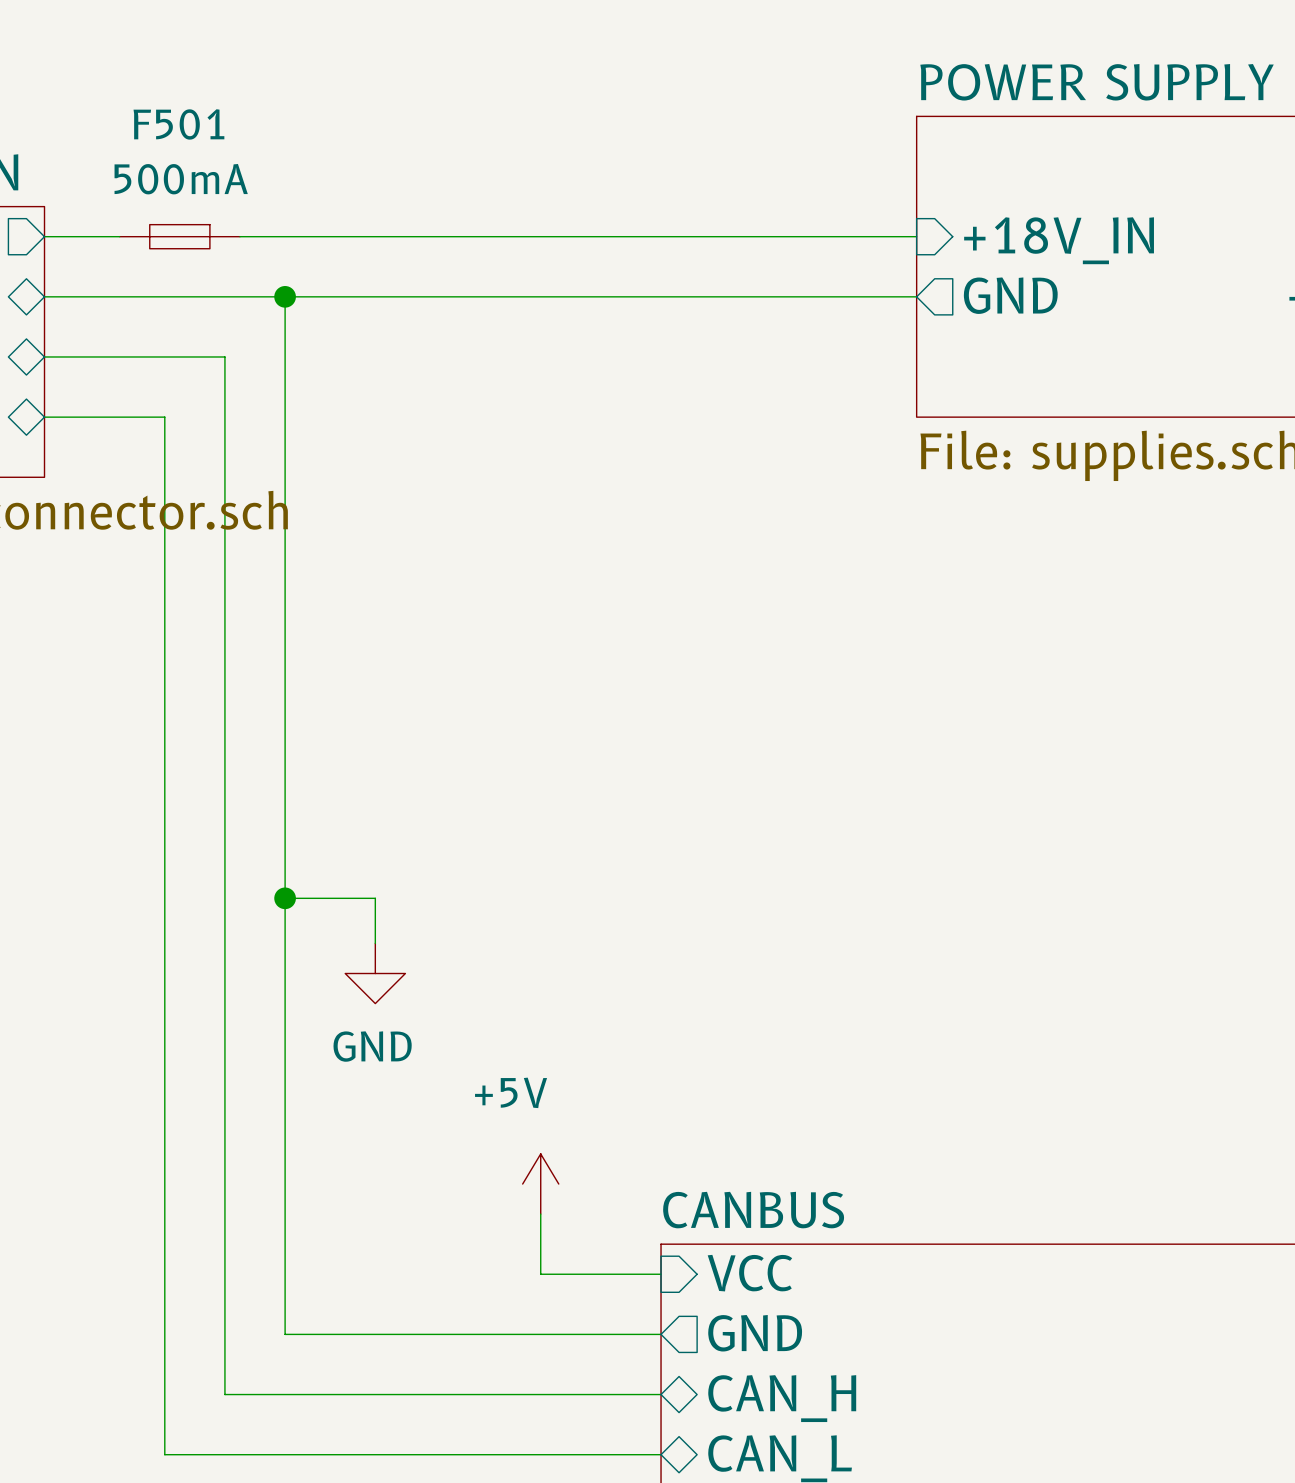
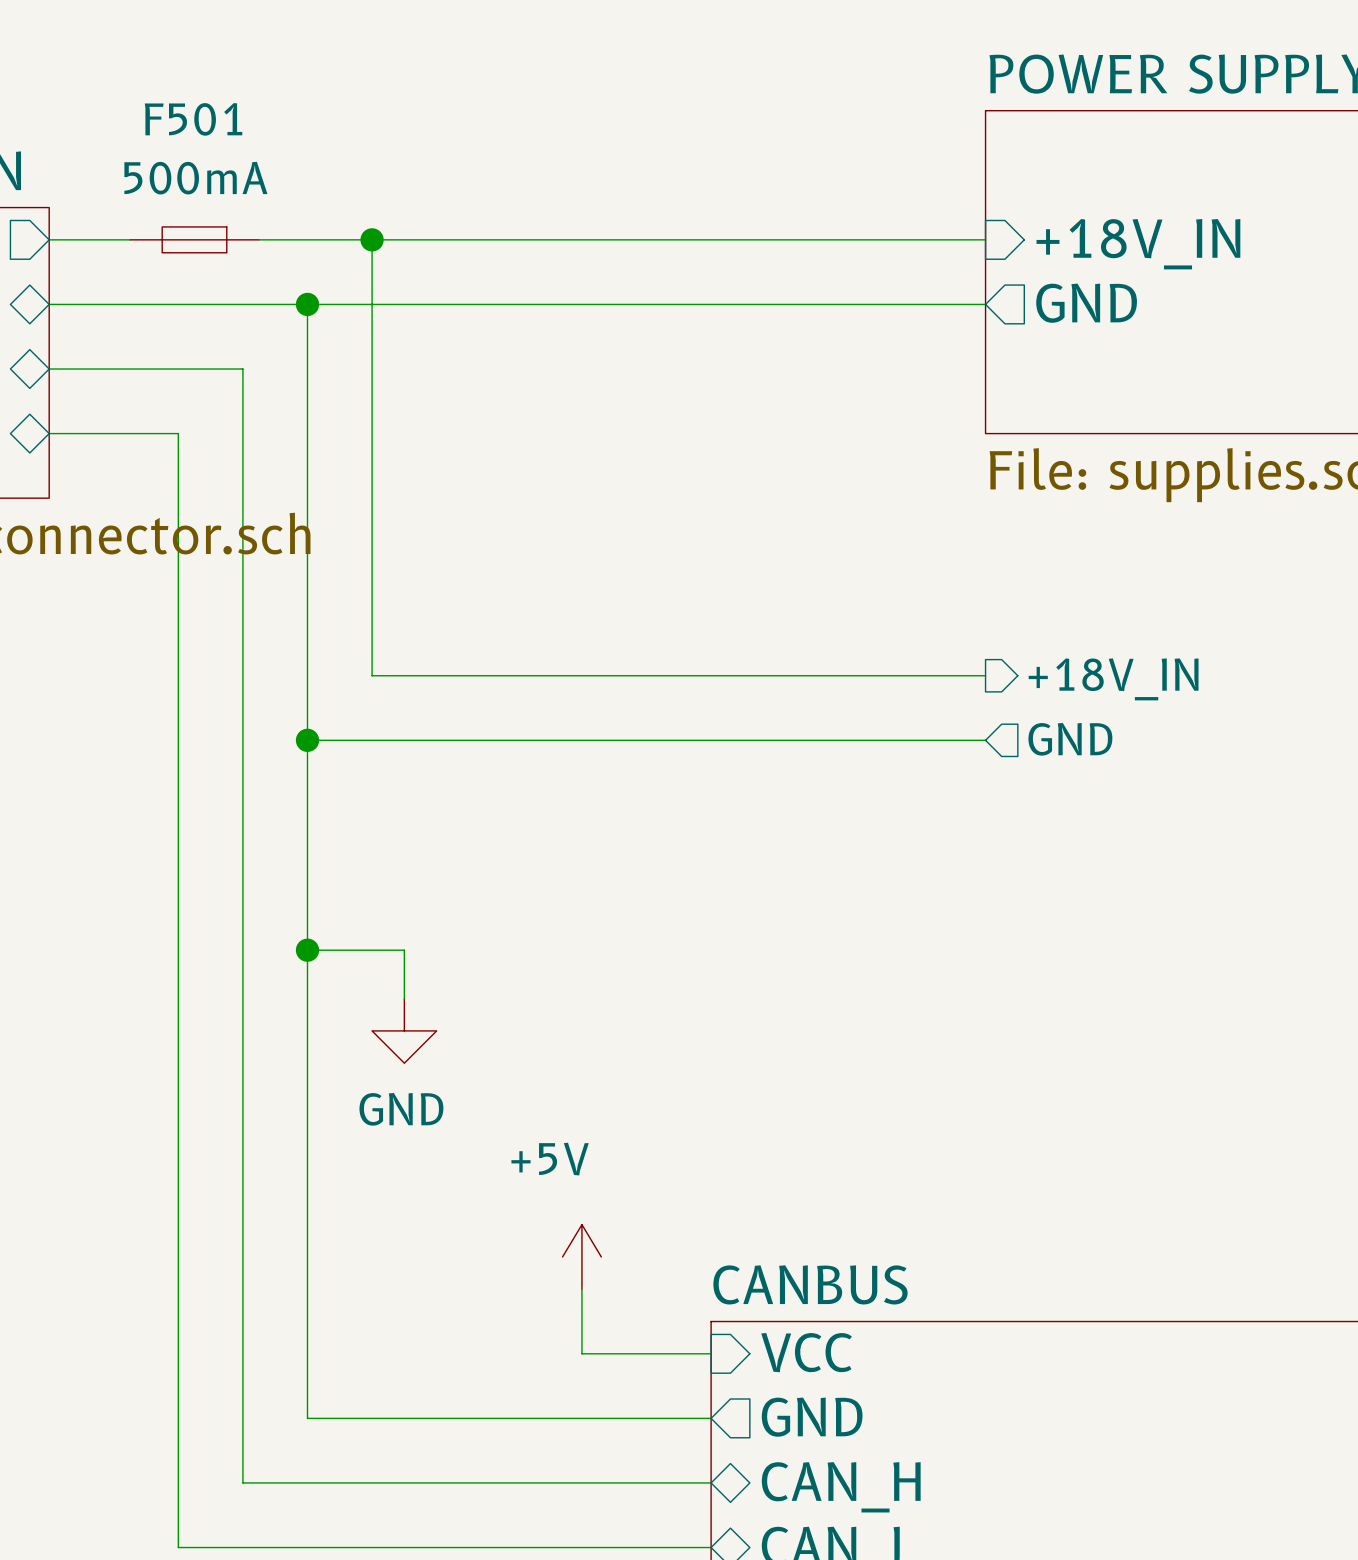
wire: none -> (372, 239) (372, 675) (985, 675)
junction: none -> (372, 239)
sheet pin: none -> +18V_IN (1113, 679)
sheet pin: none -> GND (1070, 739)
wire: none -> (307, 740) (985, 740)
junction: none -> (307, 740)

